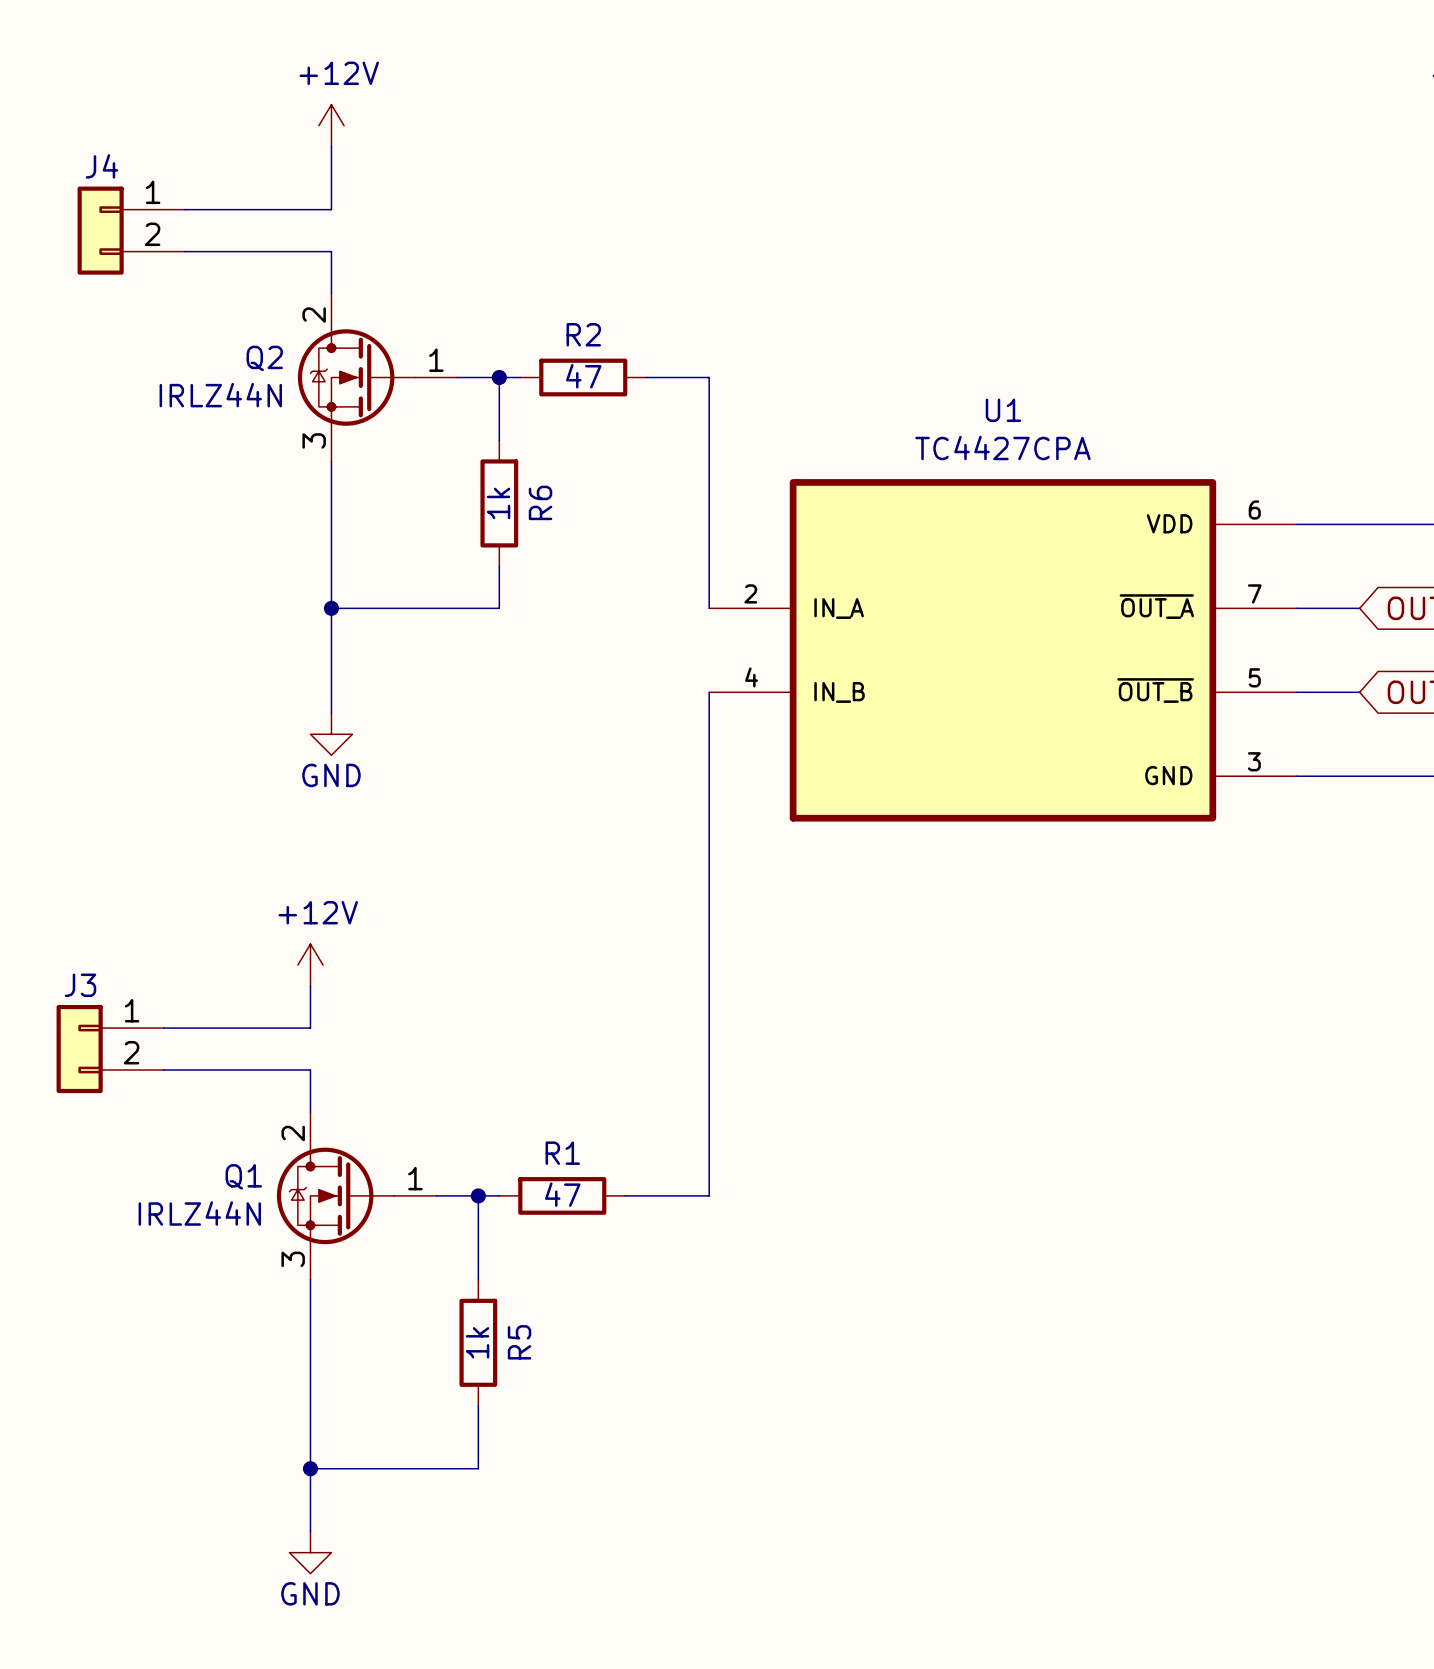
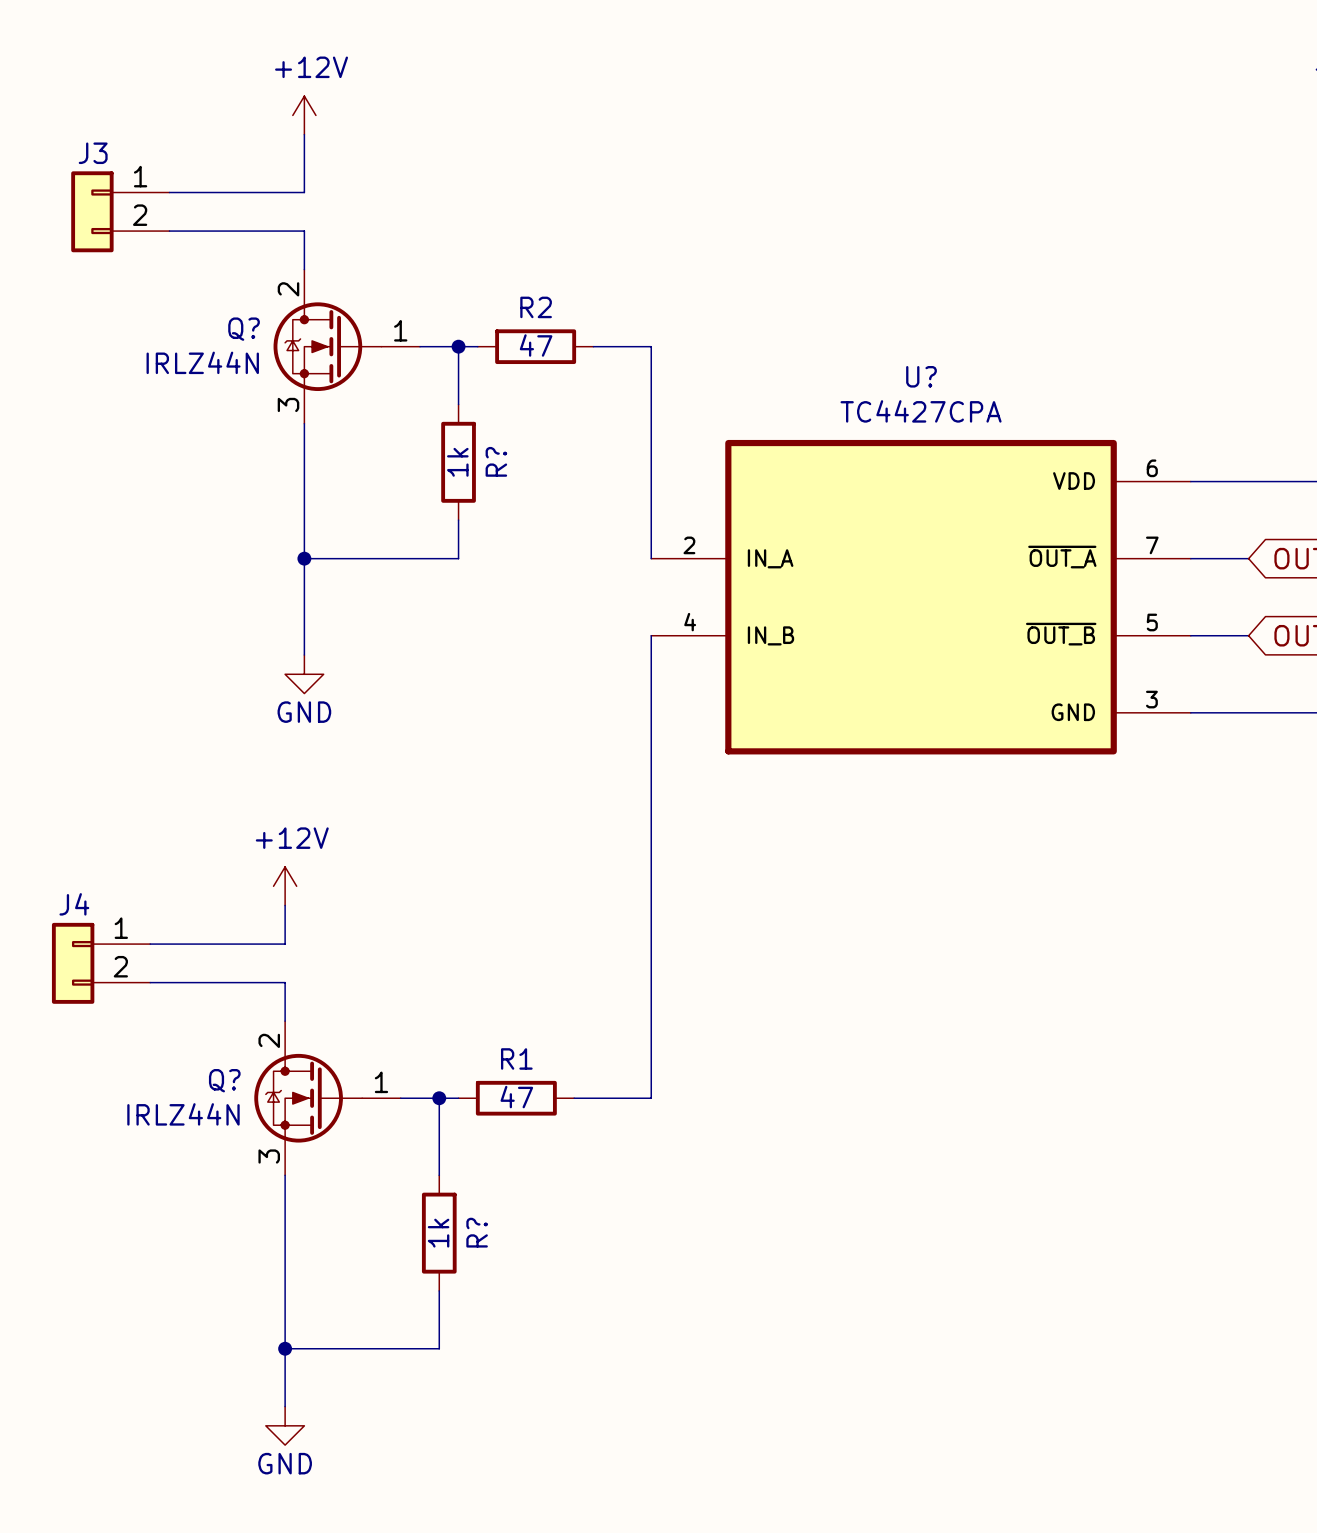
J4 name: J4 (101, 166) -> J3 (93, 153)
Q2 name: Q2 (264, 358) -> Q? (244, 329)
U1 name: U1 (1003, 410) -> U? (921, 376)
R6 name: R6 (540, 502) -> R? (496, 461)
J3 name: J3 (80, 985) -> J4 (74, 904)
Q1 name: Q1 (243, 1176) -> Q? (224, 1080)
R5 name: R5 (519, 1342) -> R? (477, 1232)

